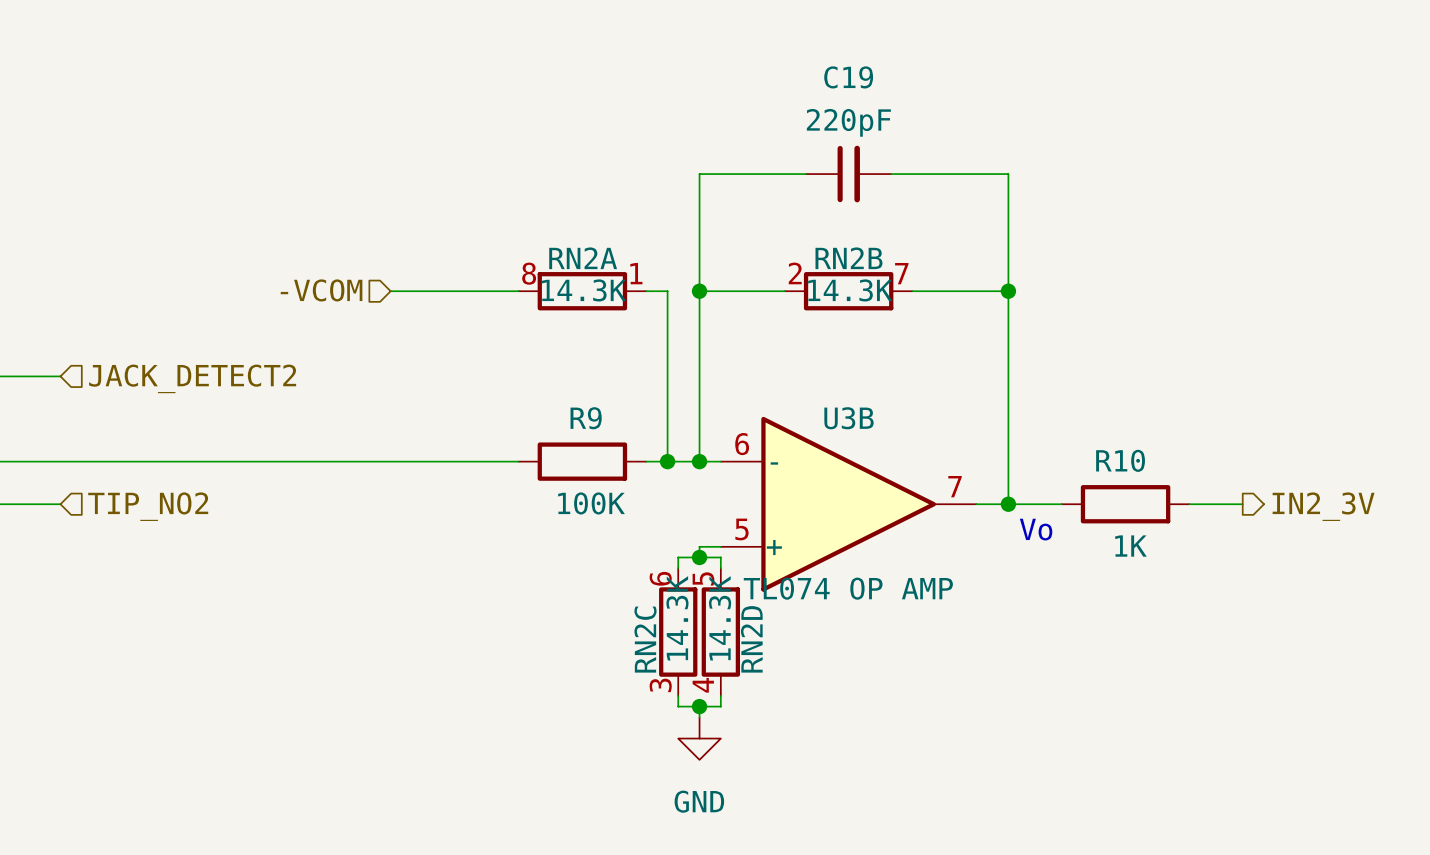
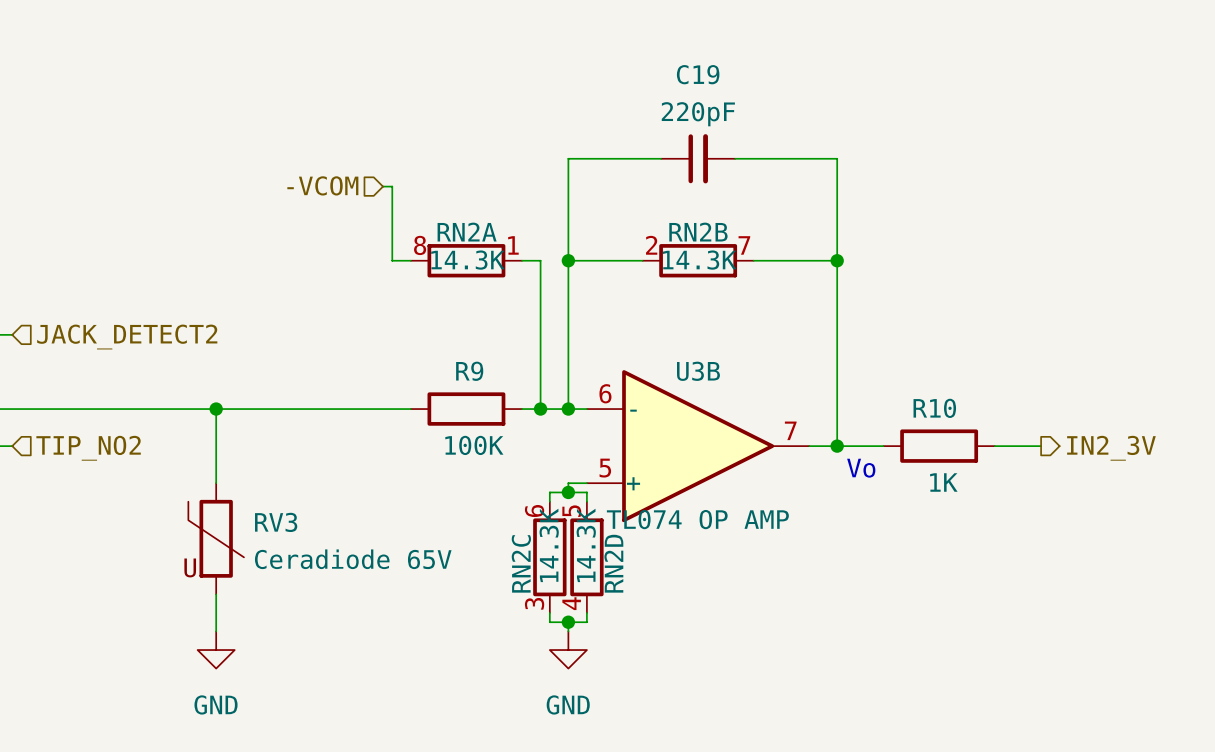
hierarchical label position: -VCOM (321, 290) -> -VCOM (322, 185)
wire: (390, 291) (497, 291) -> (383, 186) (392, 186) (392, 260)
wire: none -> (216, 409) (216, 483)
junction: none -> (216, 409)
RV3: none -> Ceradiode 65V (216, 538)
wire: none -> (216, 594) (216, 631)
power symbol: none -> GND (216, 650)

